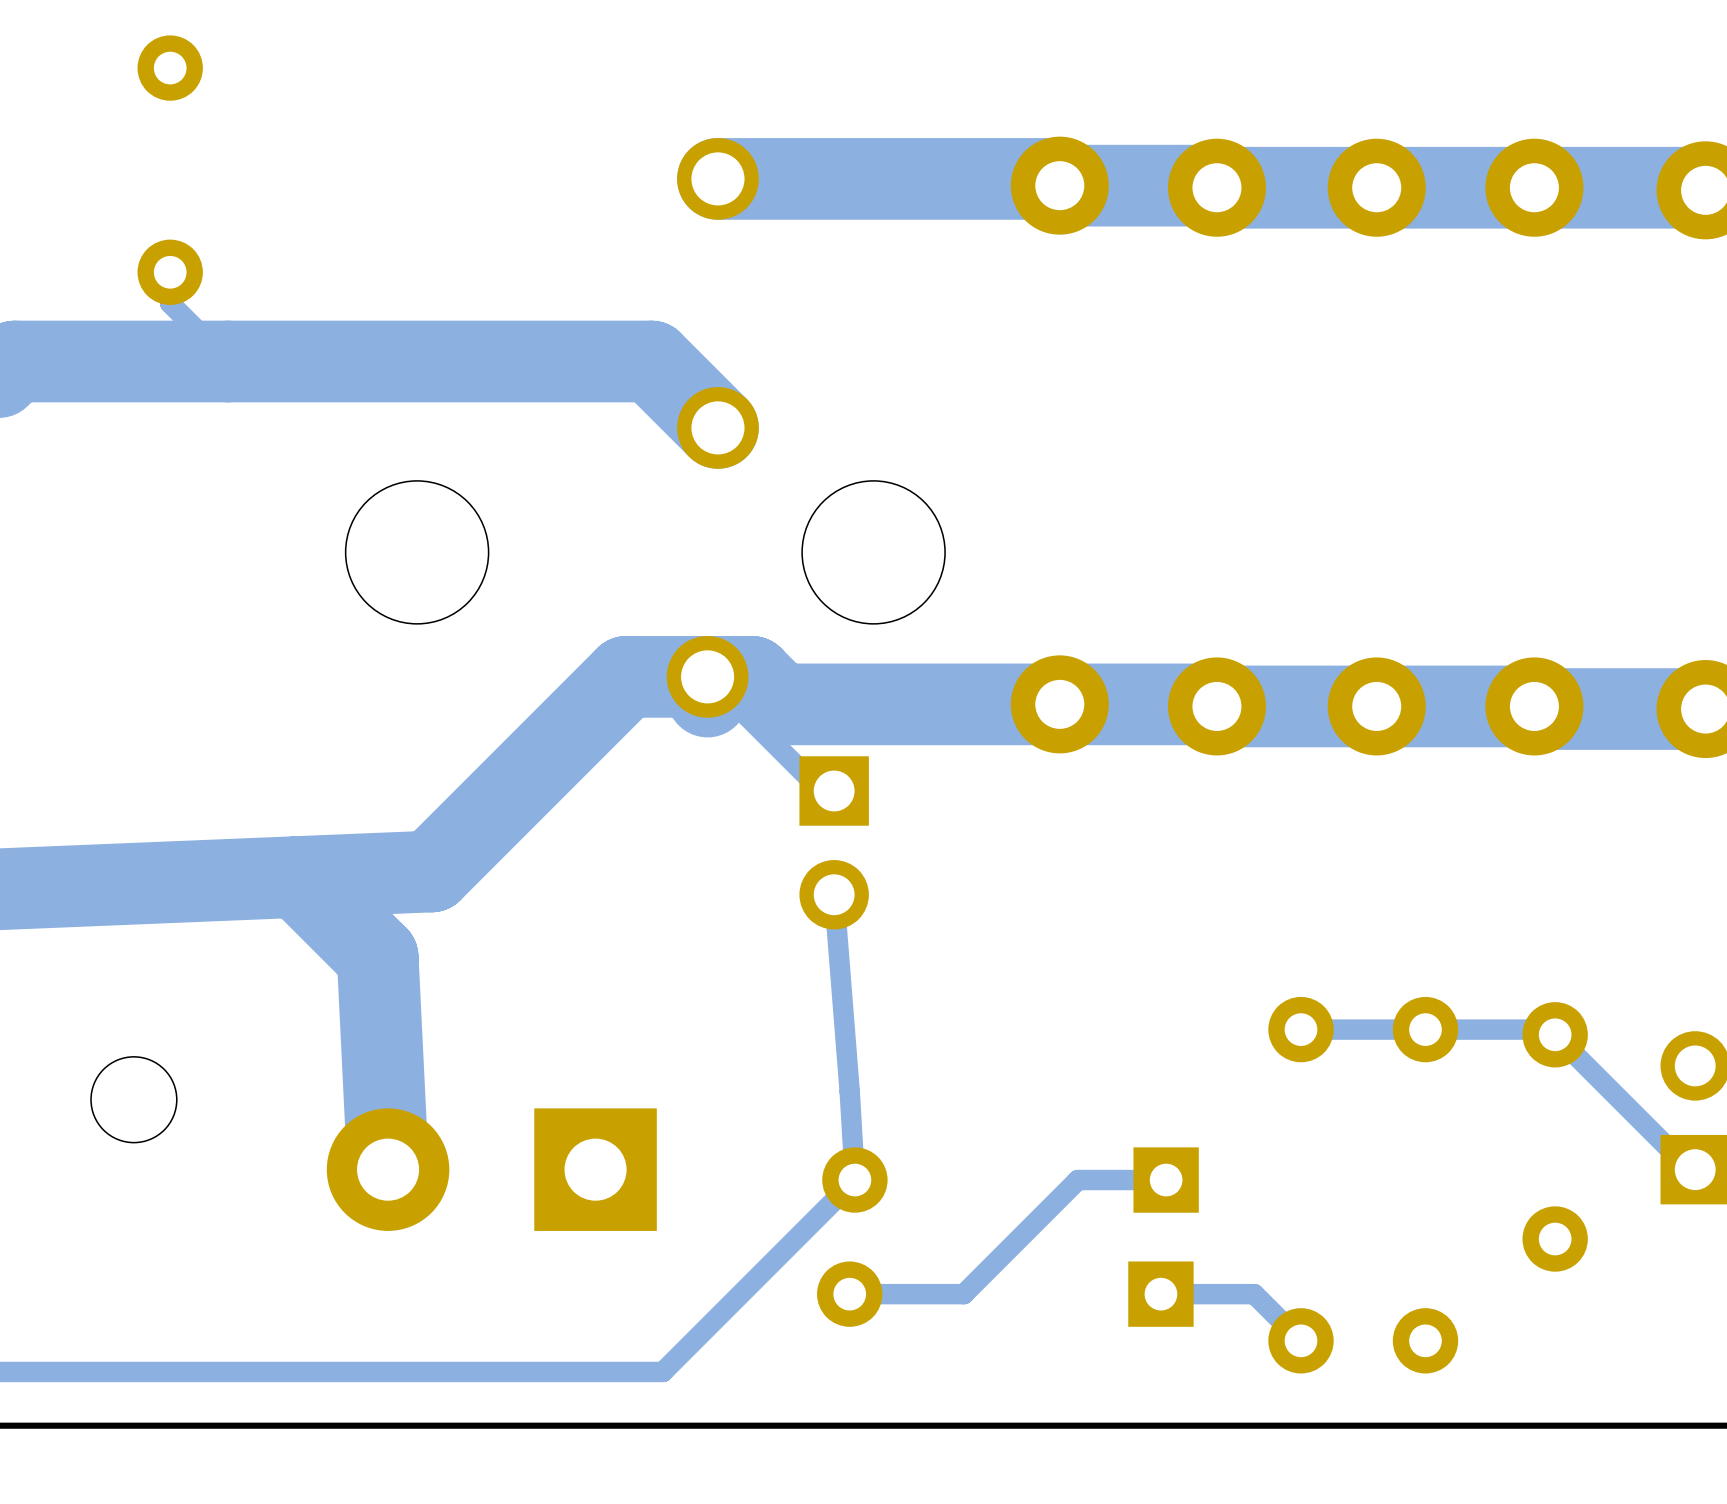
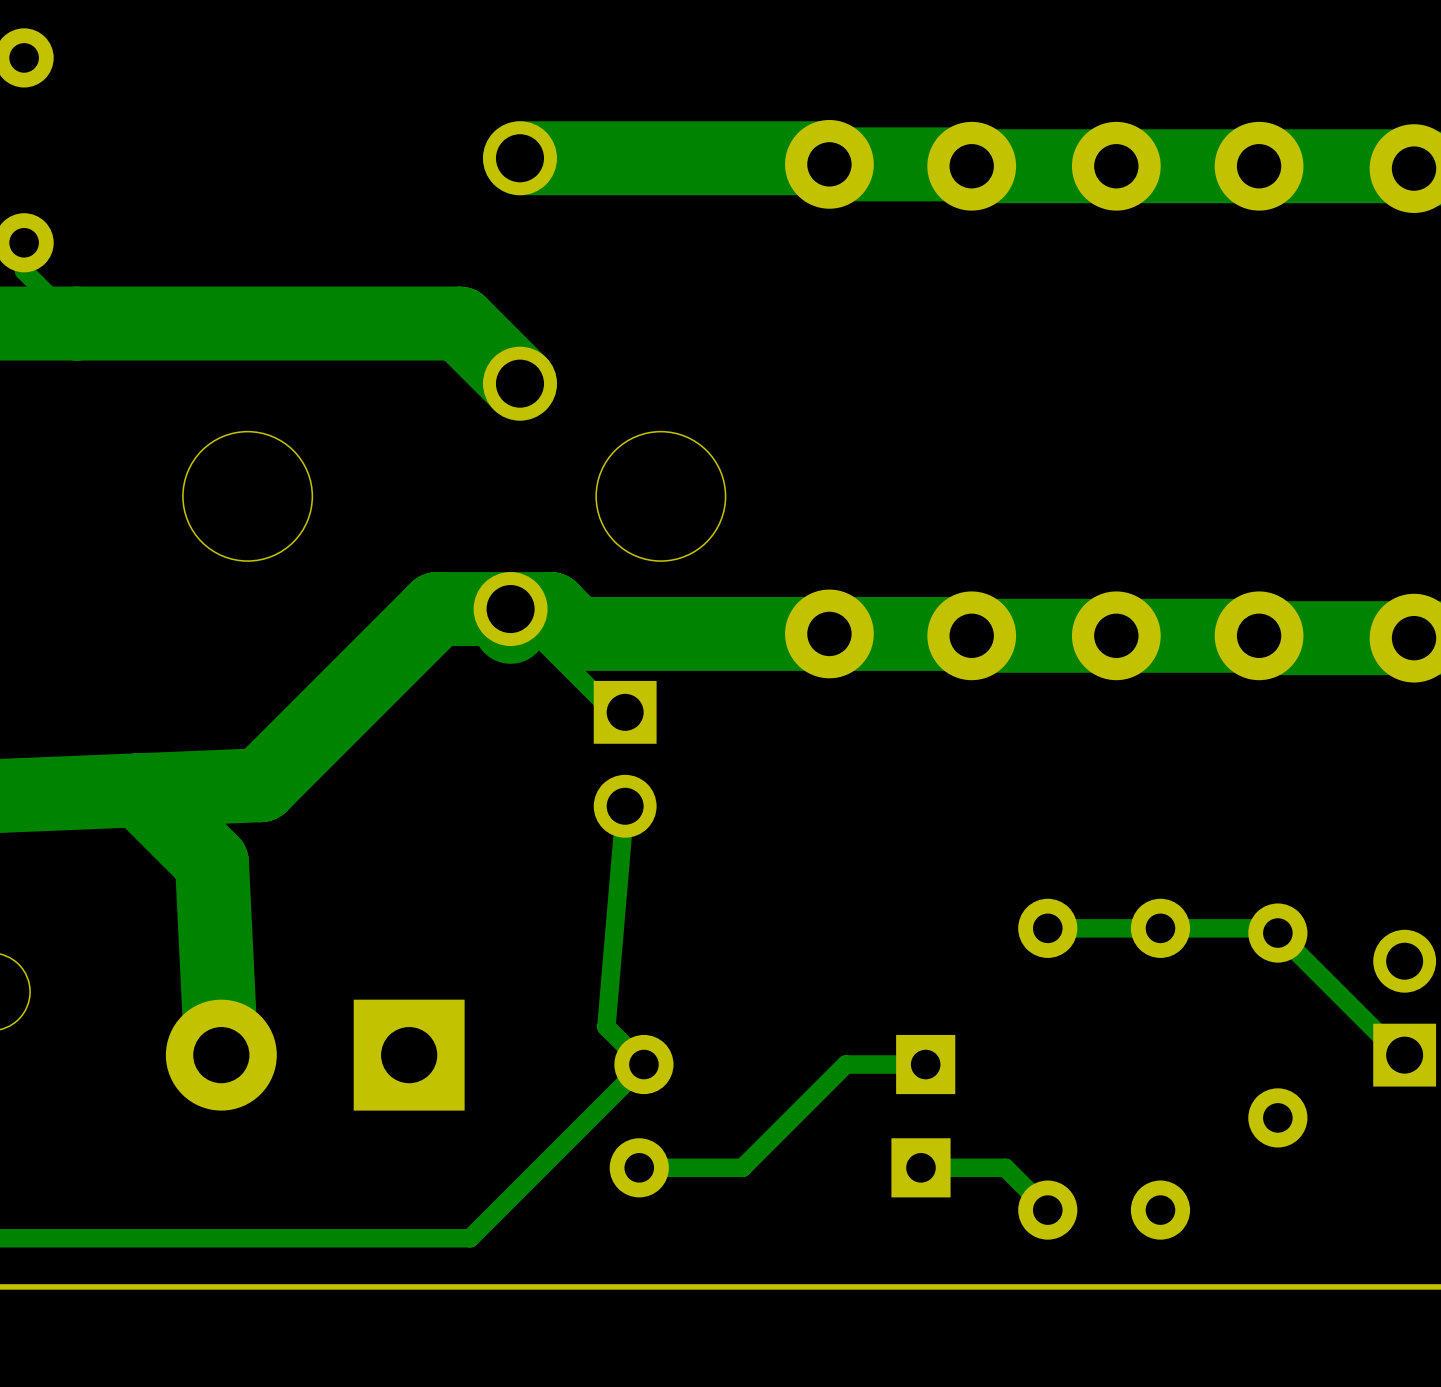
track: (834, 894) (854, 1180) -> (625, 806) (606, 1026) (643, 1064)

